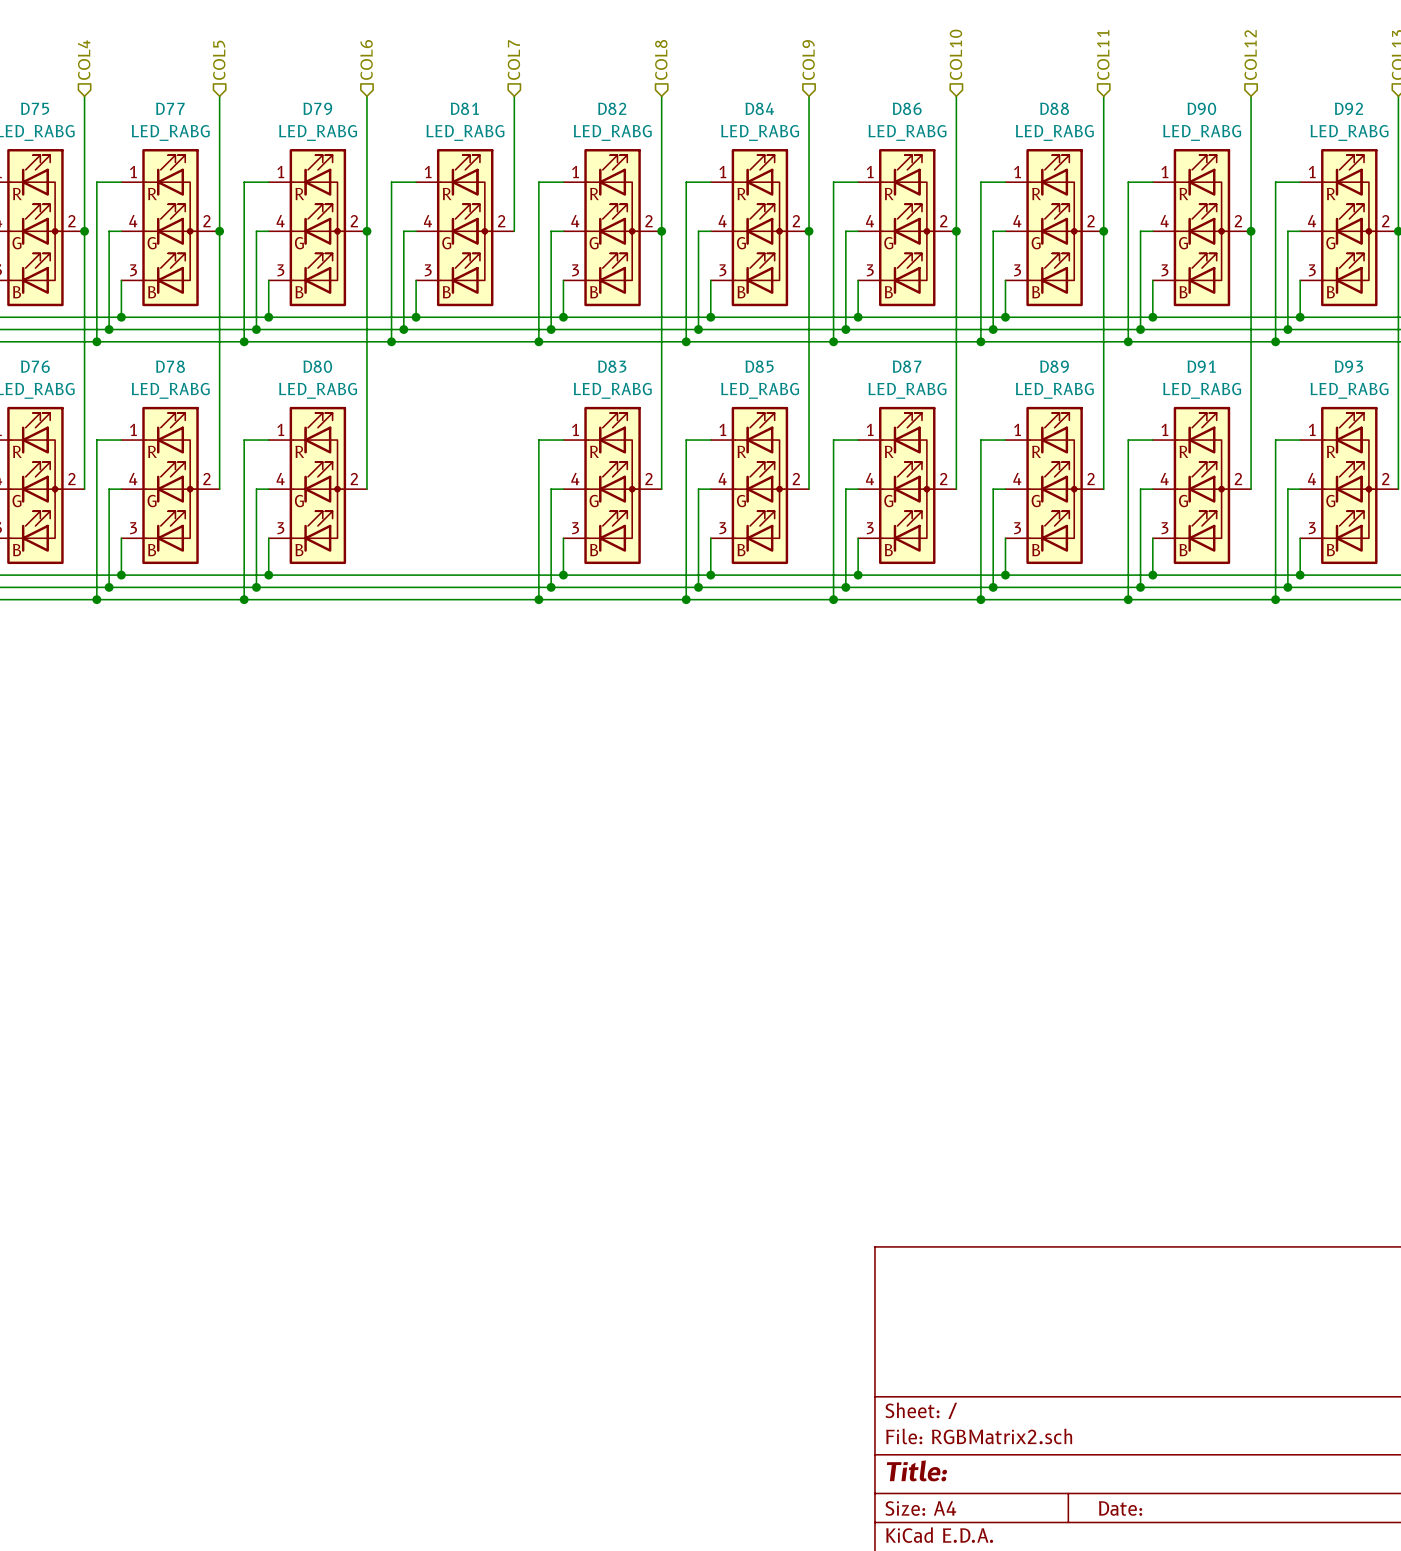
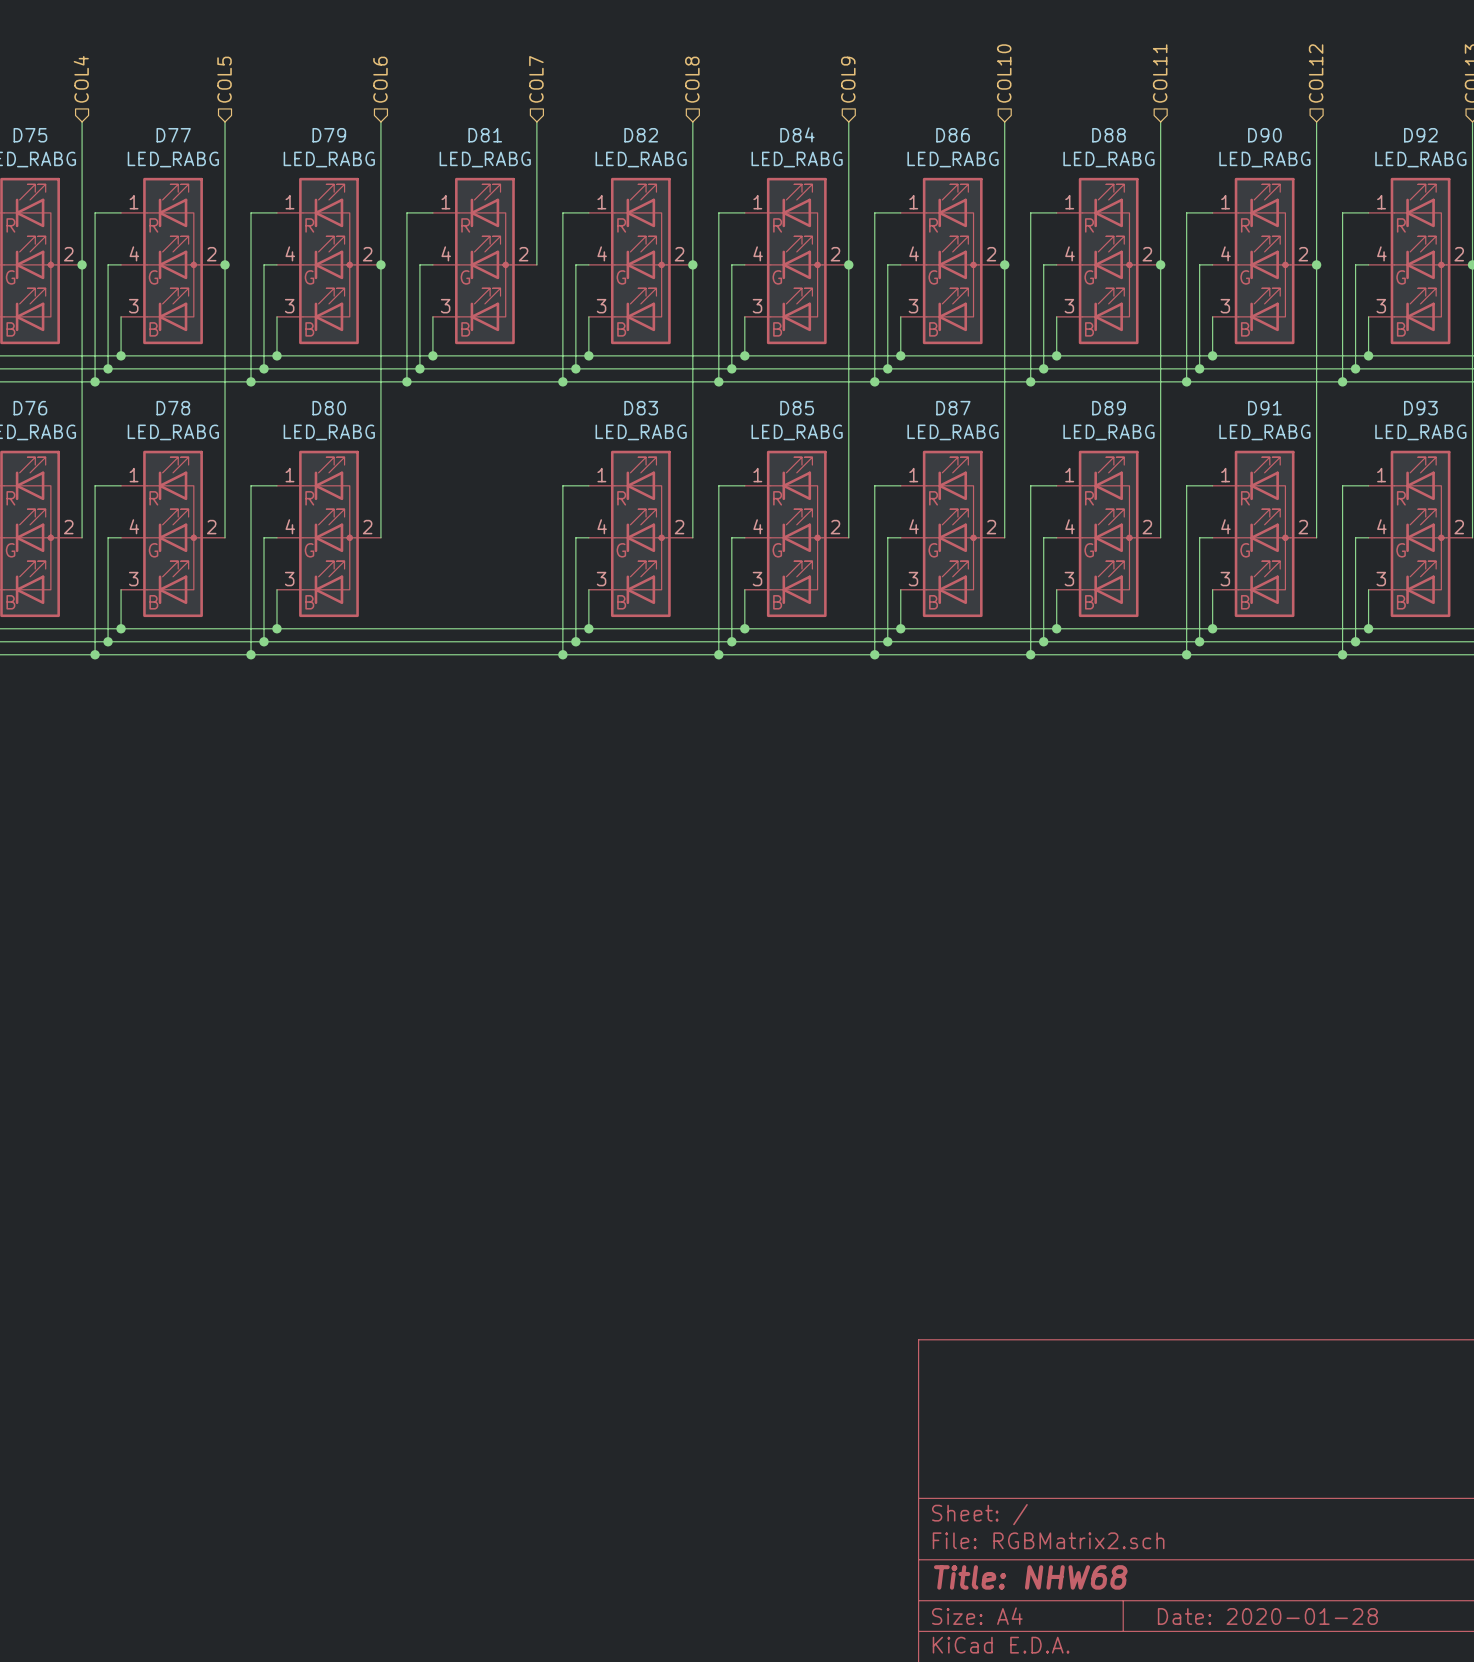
title block: Title: (916, 1470) -> Title: NHW68 (1030, 1577)
title block: Date: (1120, 1508) -> Date: 2020-01-28 (1267, 1616)

